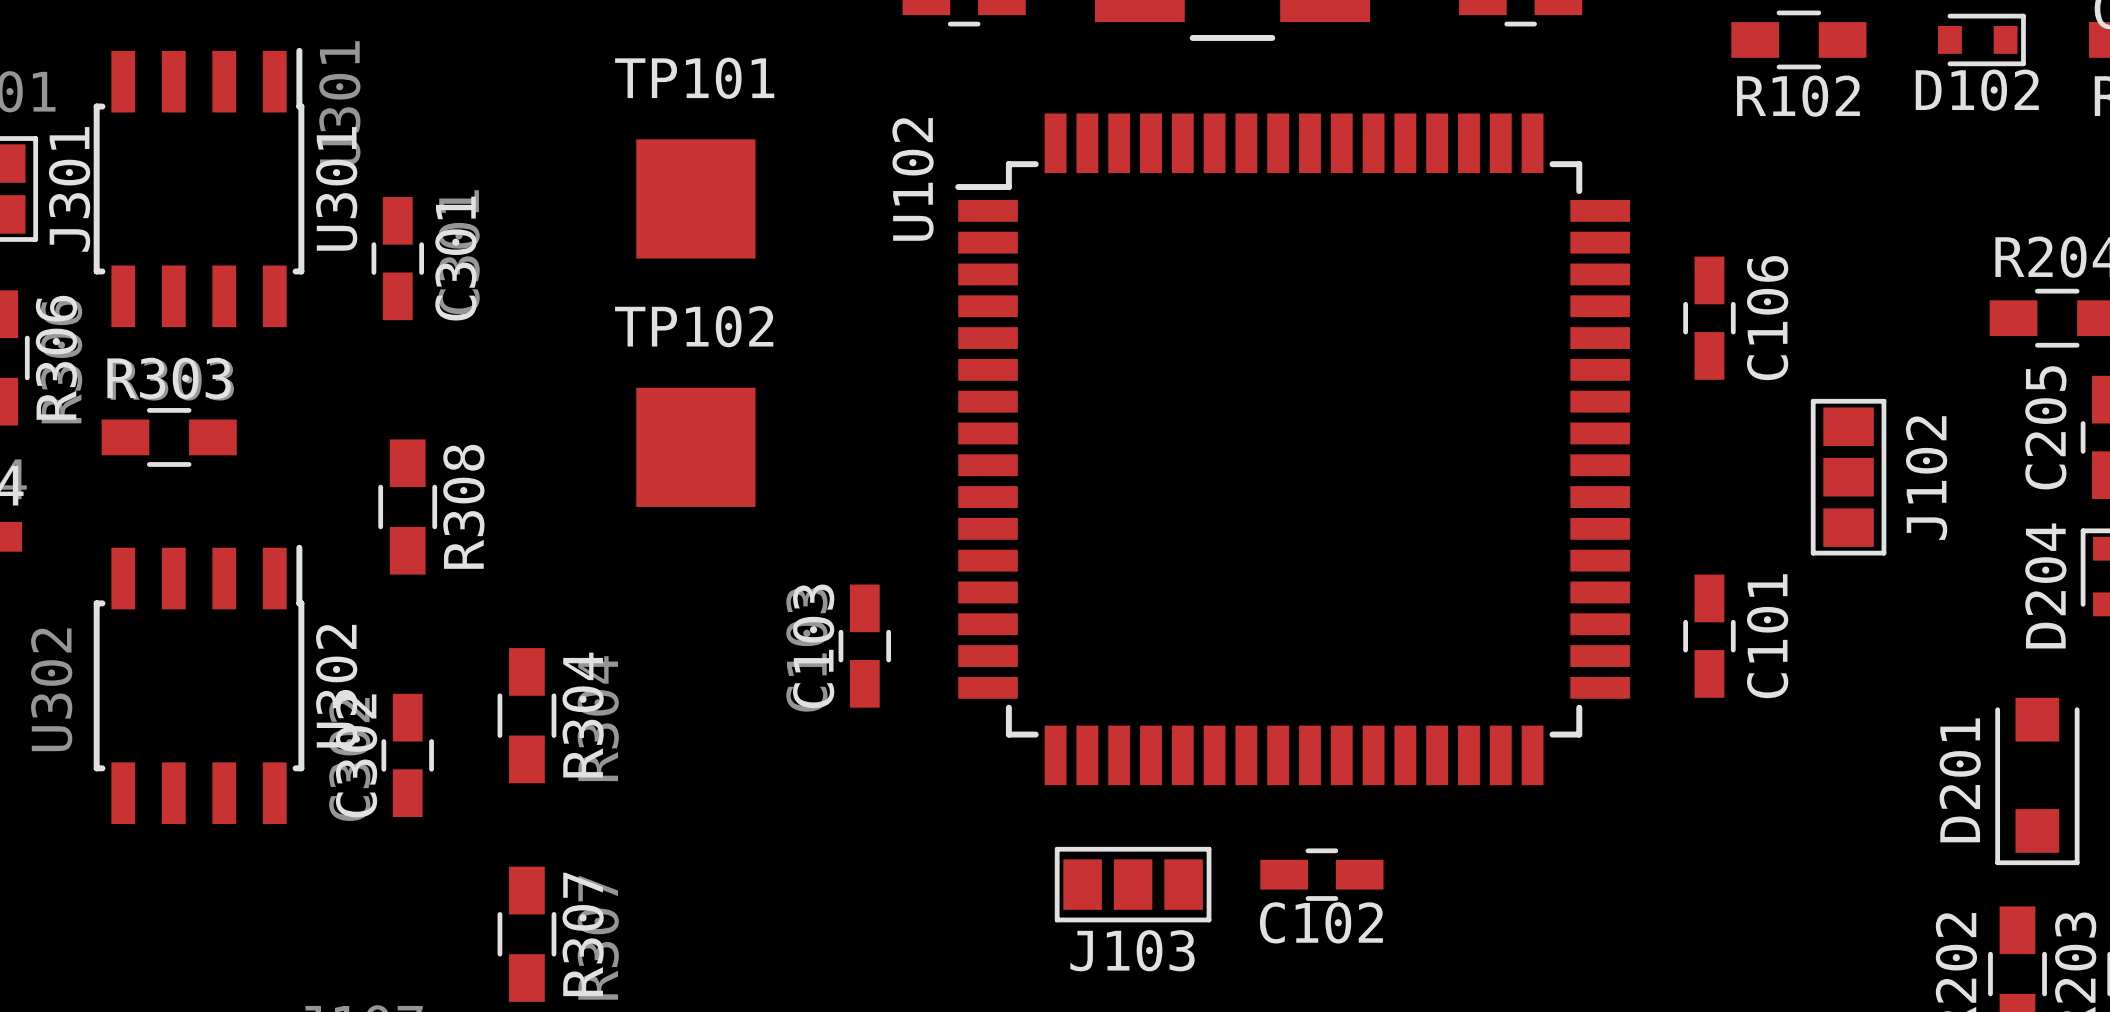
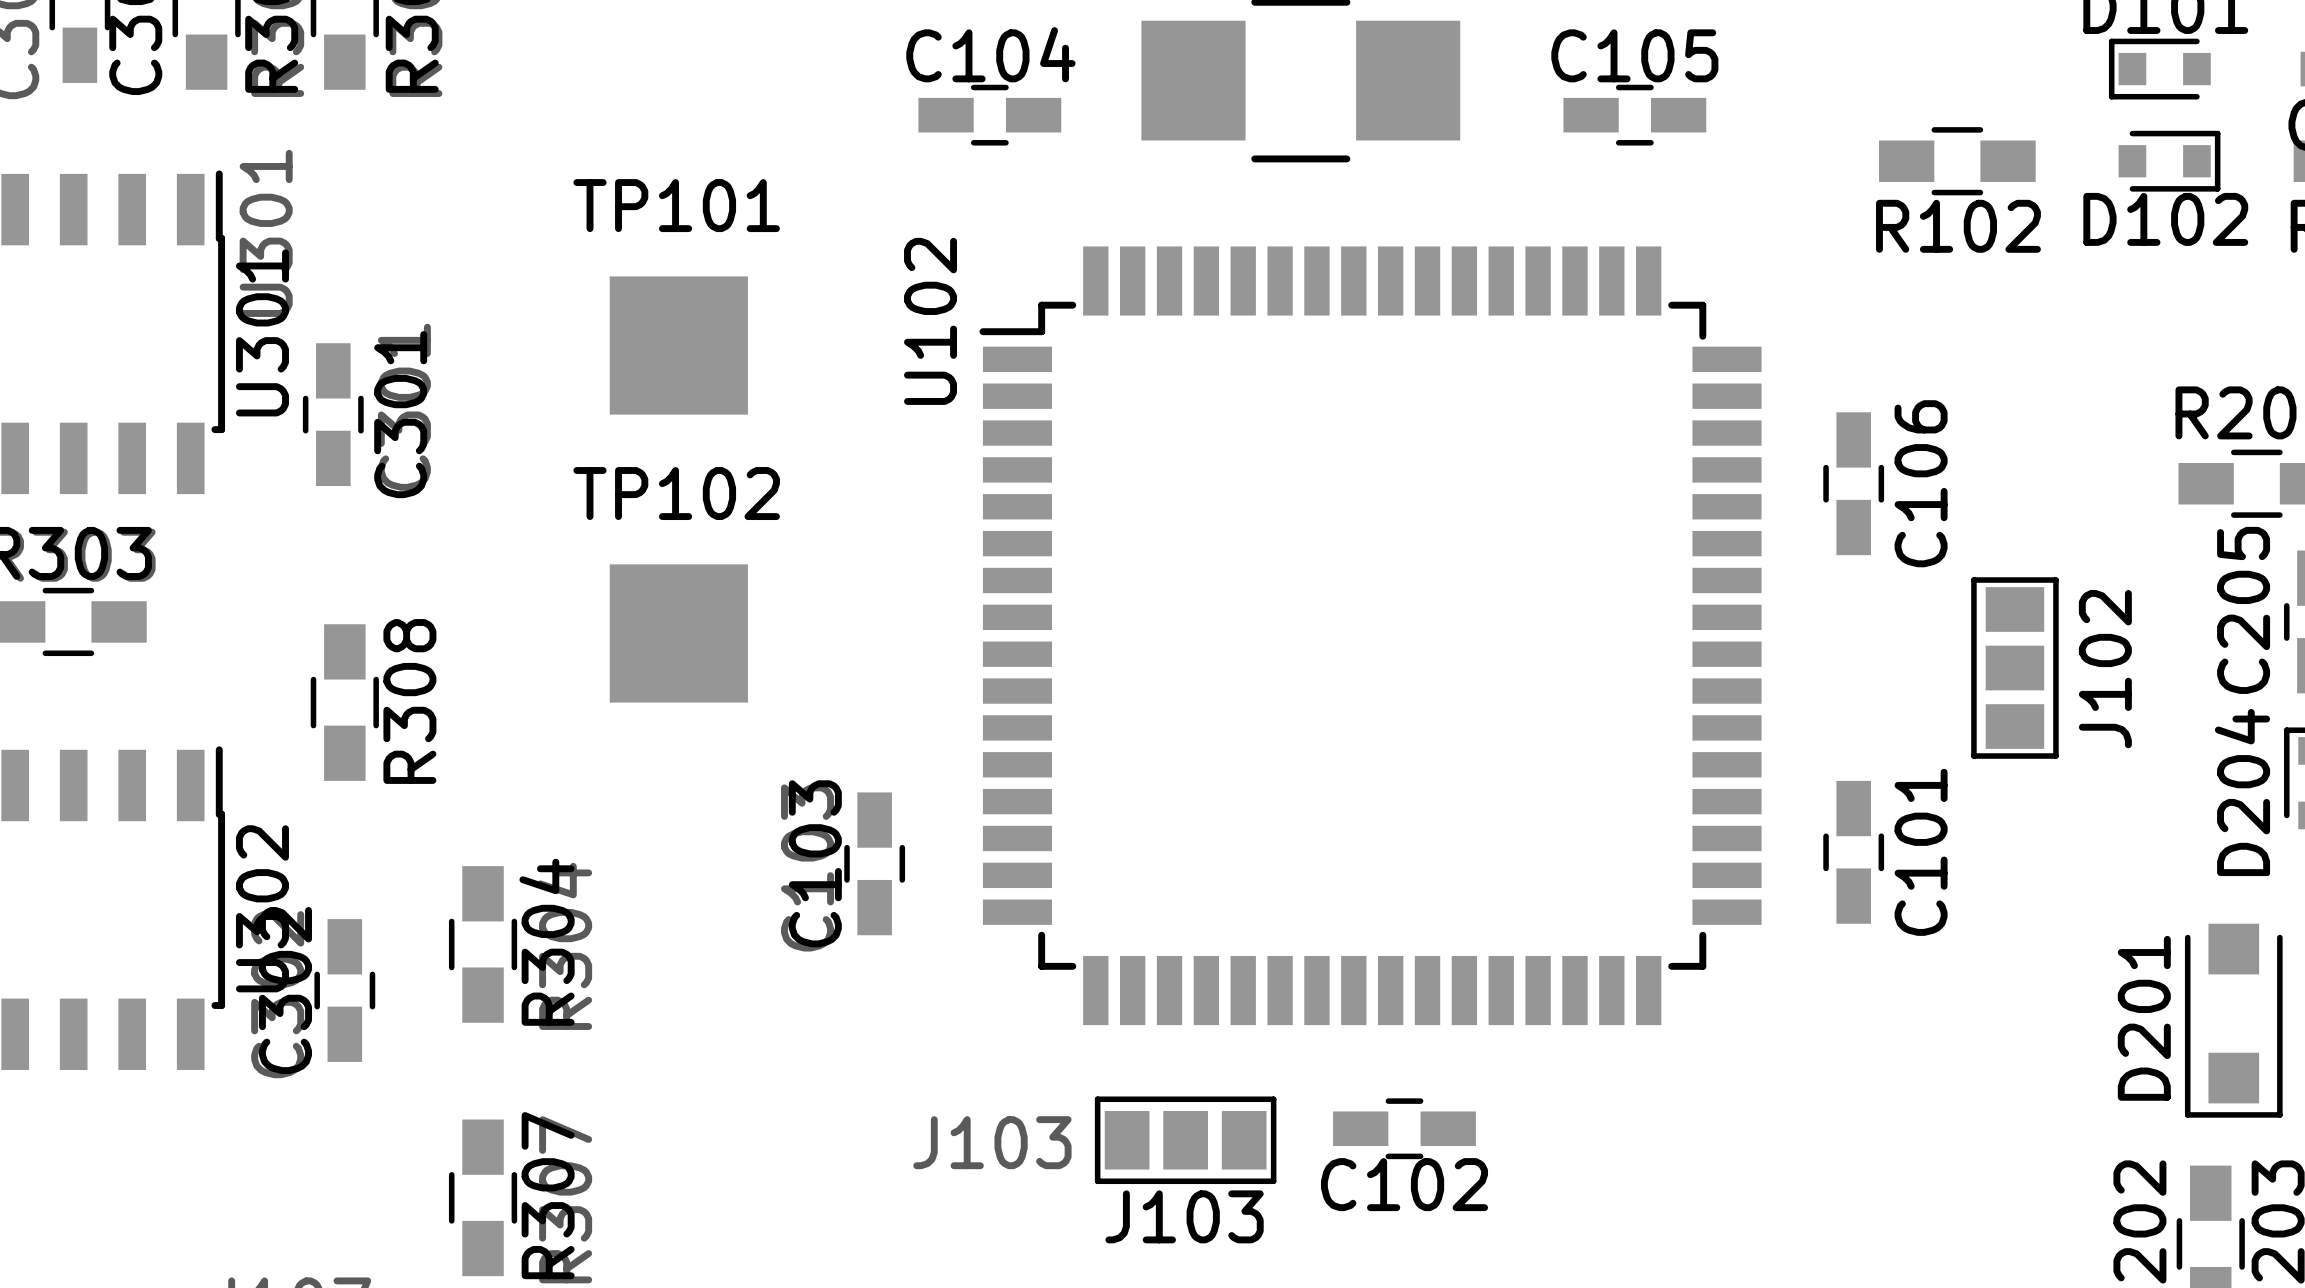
text: none -> J103 (992, 1142)

